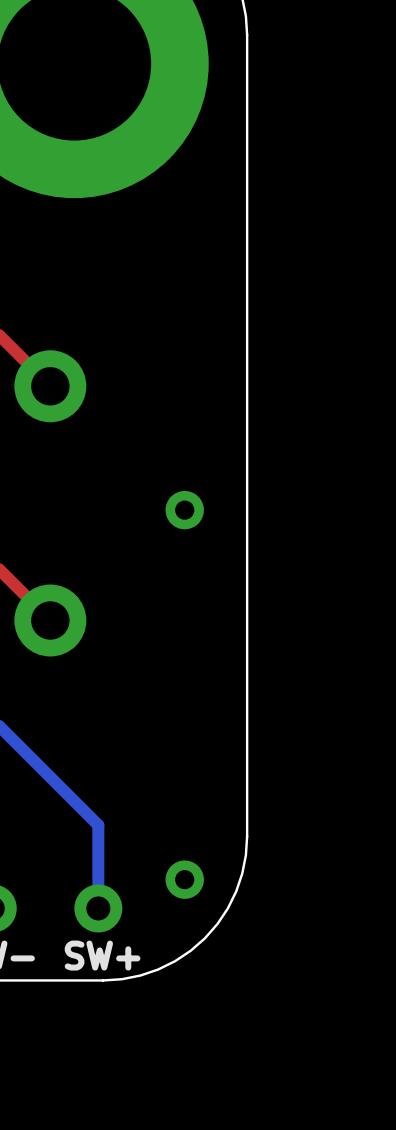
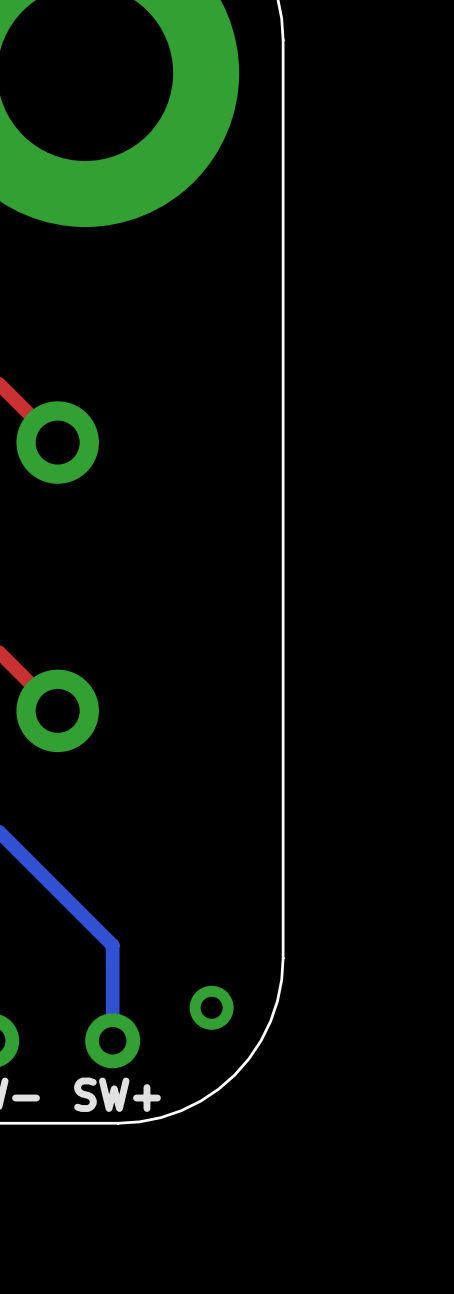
via: (184, 510) -> none

